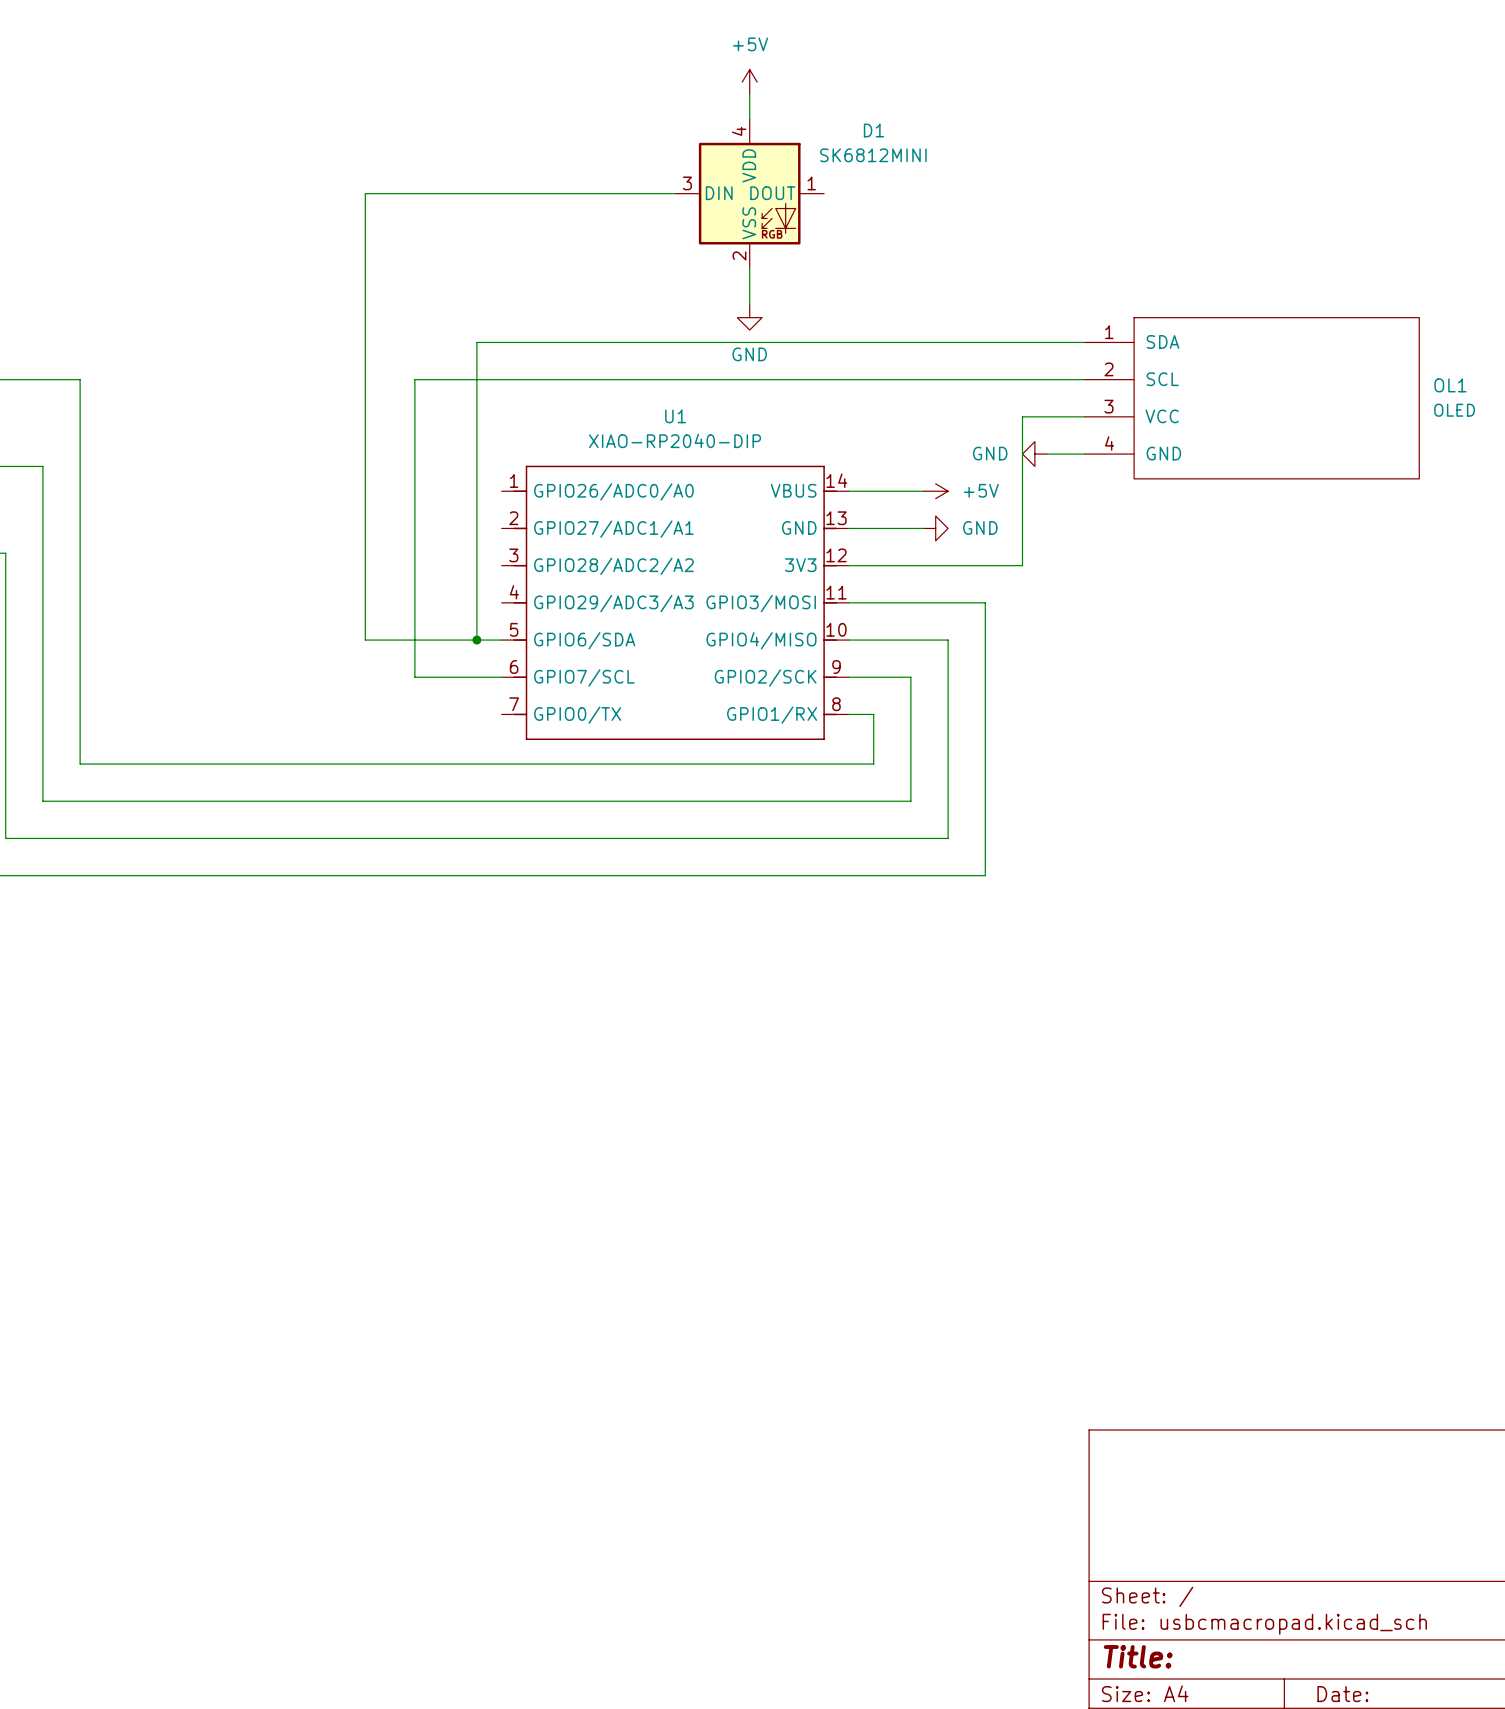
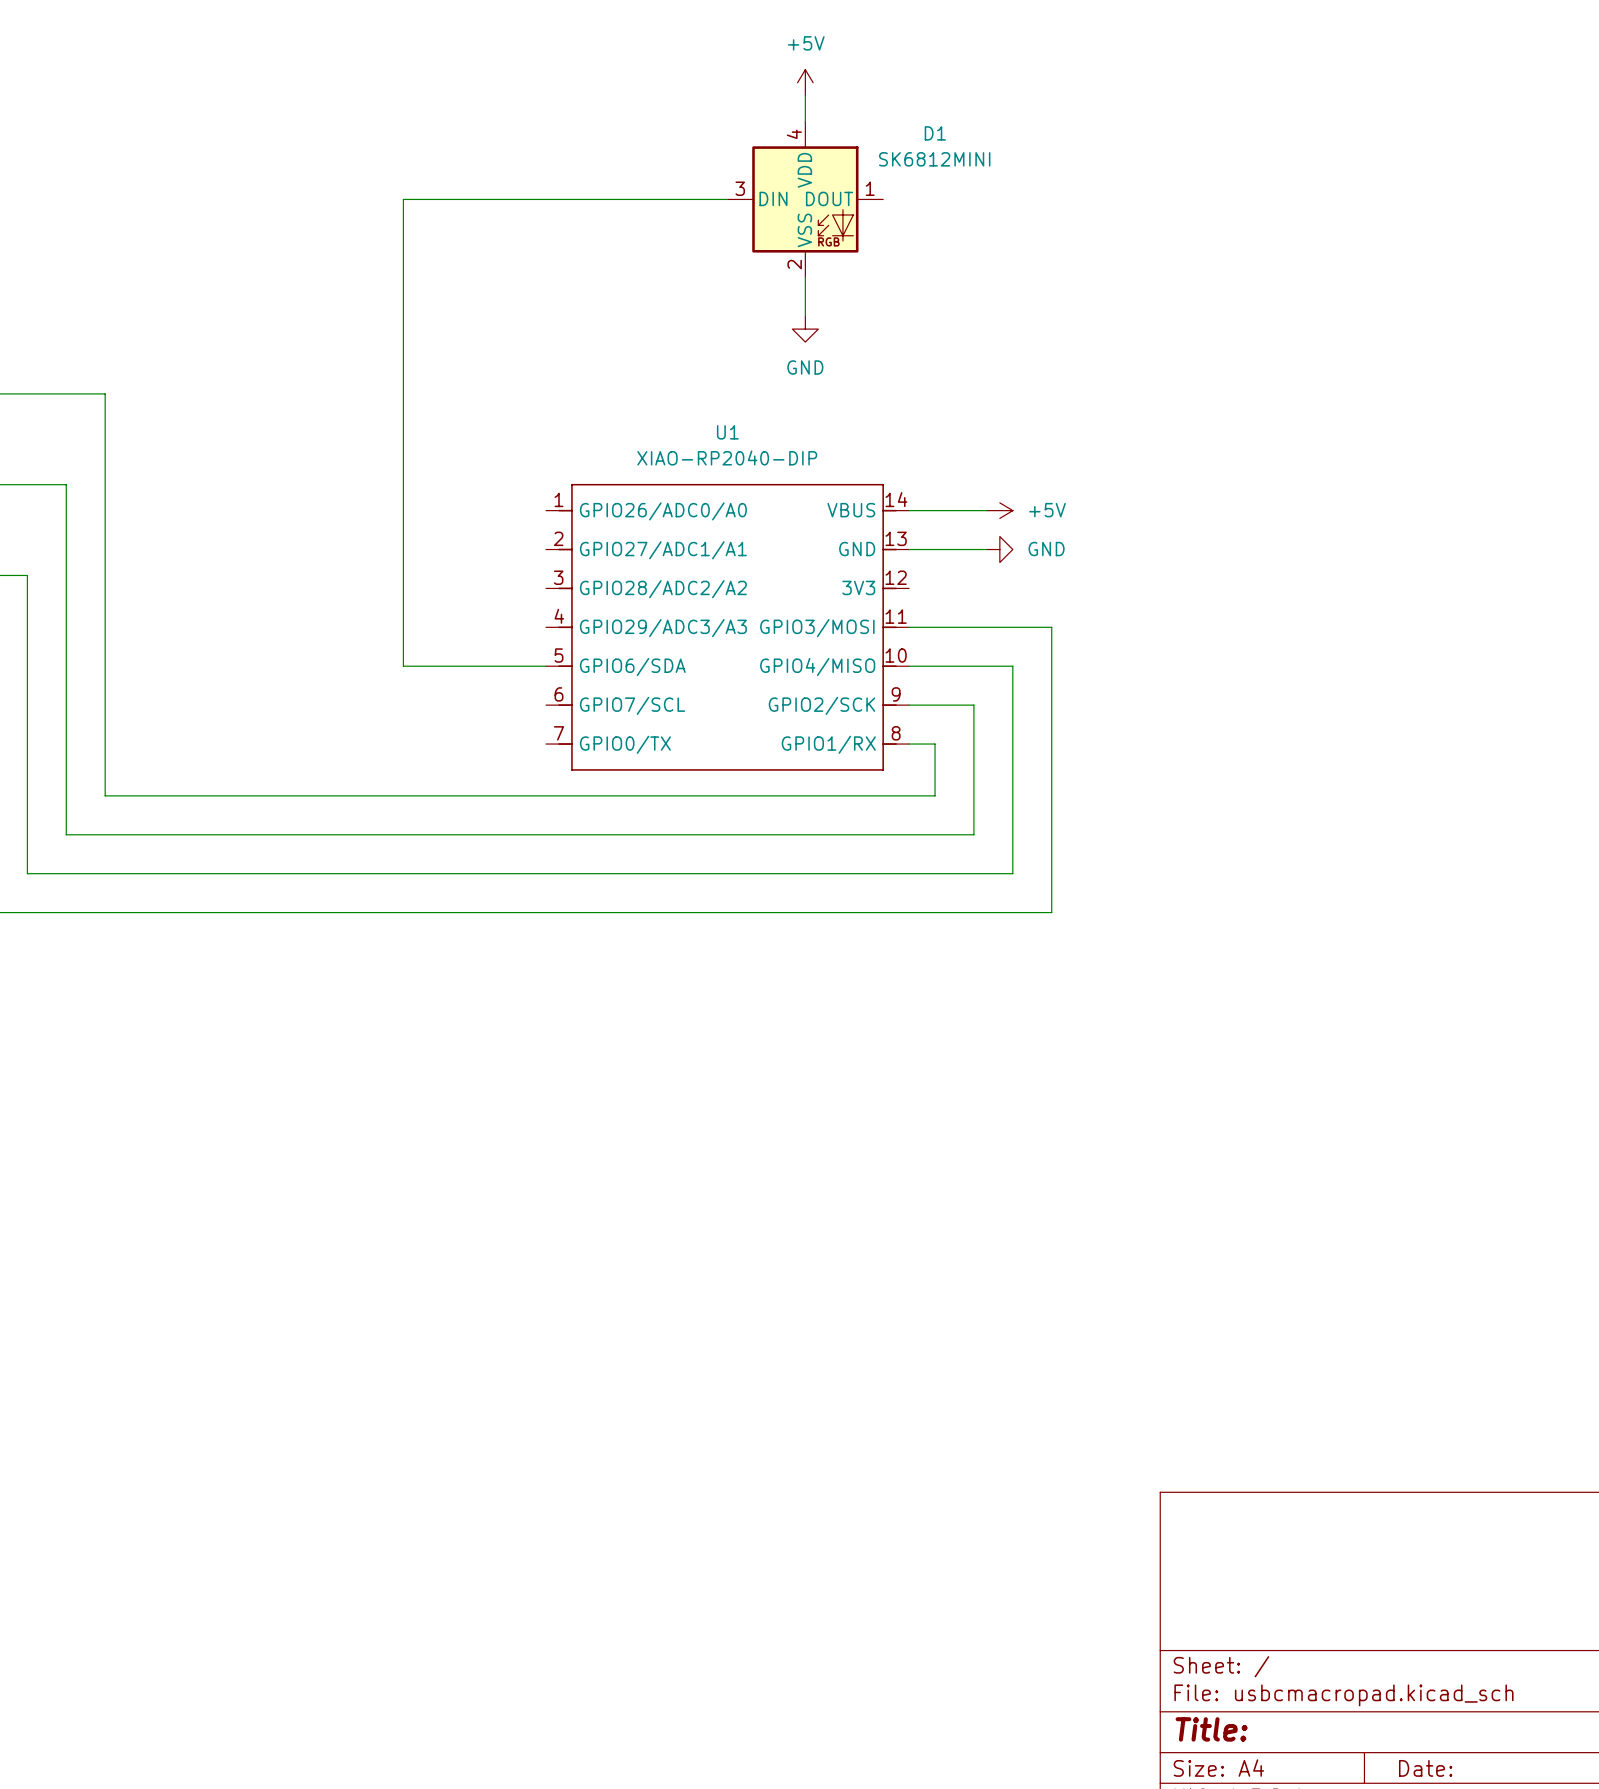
wire: (1084, 342) (476, 342) (476, 640) -> none
wire: (1084, 379) (414, 379) (414, 677) (501, 677) -> none
OL1: OLED (1251, 398) -> none
wire: (1084, 416) (1022, 416) (1022, 565) (848, 565) -> none
power symbol: GND (1034, 454) -> none
wire: (1047, 454) (1084, 454) -> none
junction: (476, 640) -> none

